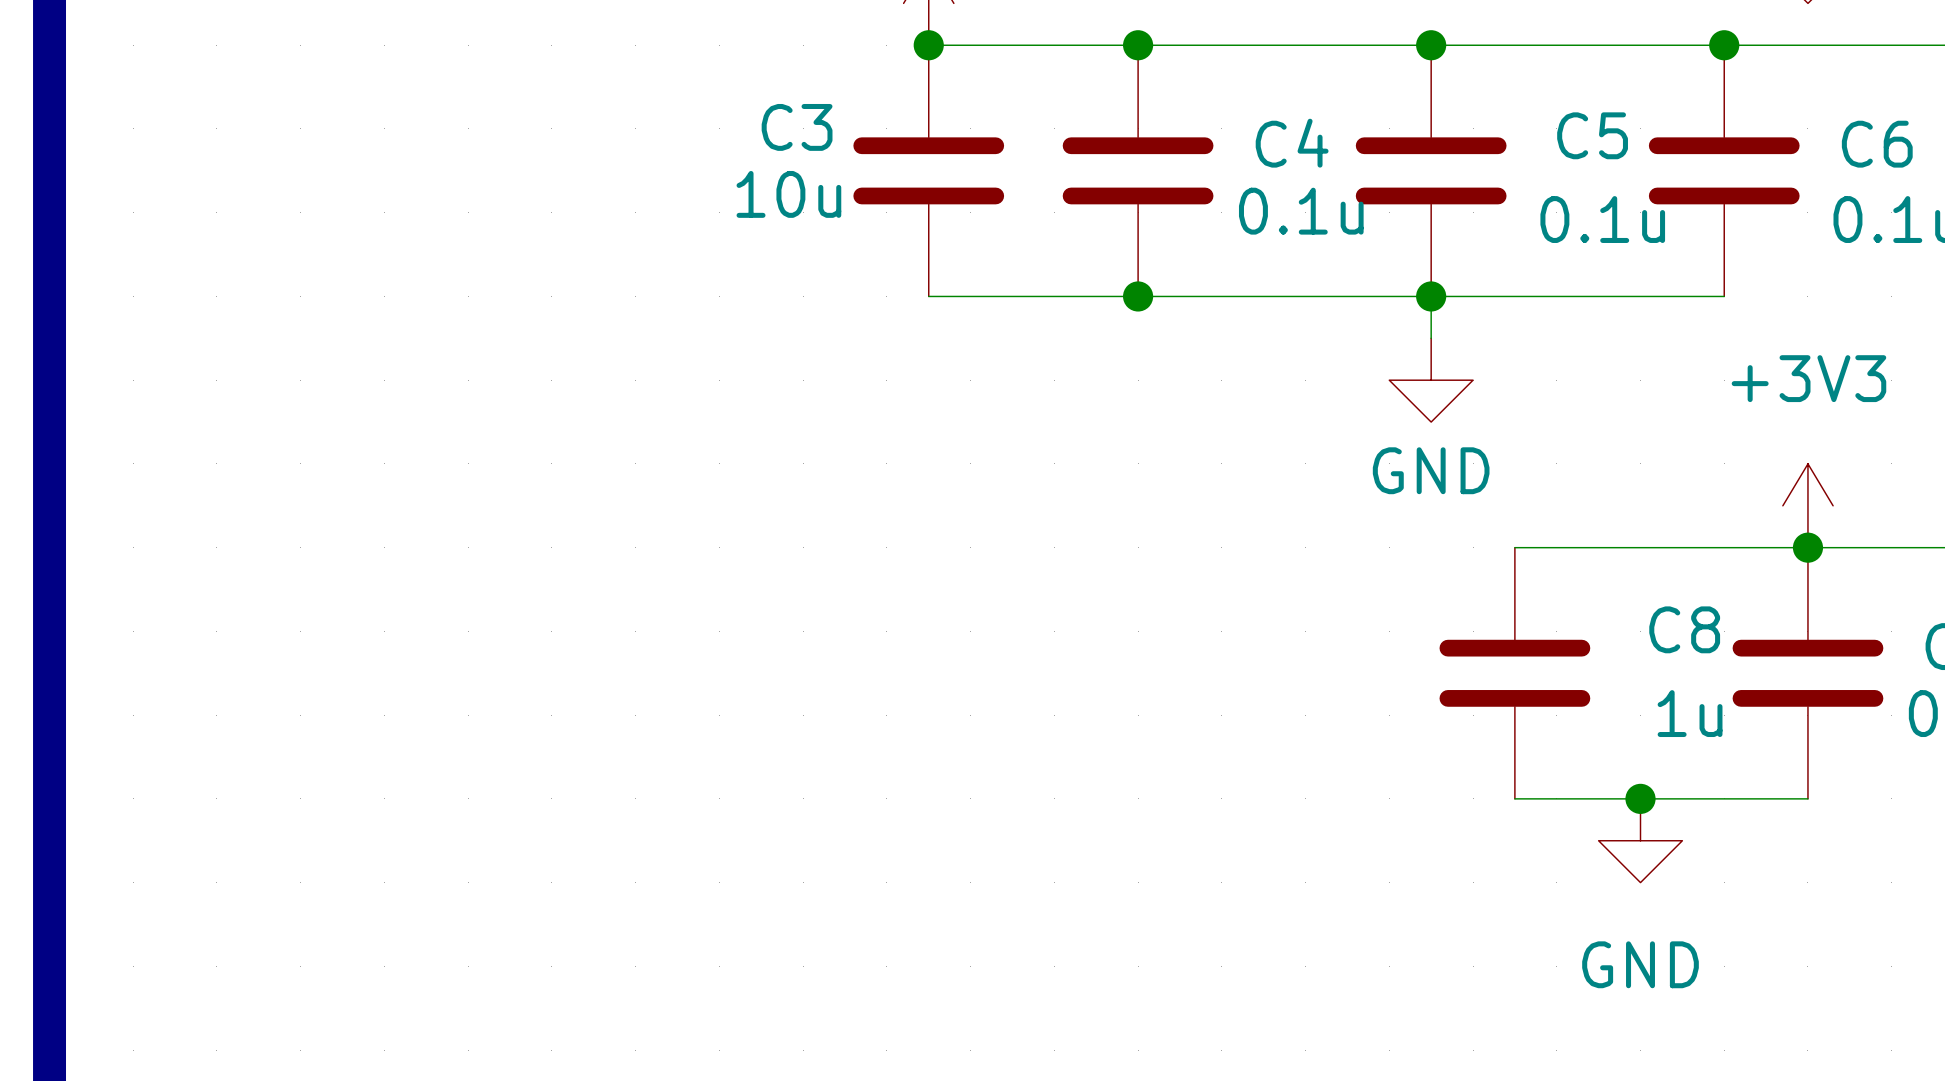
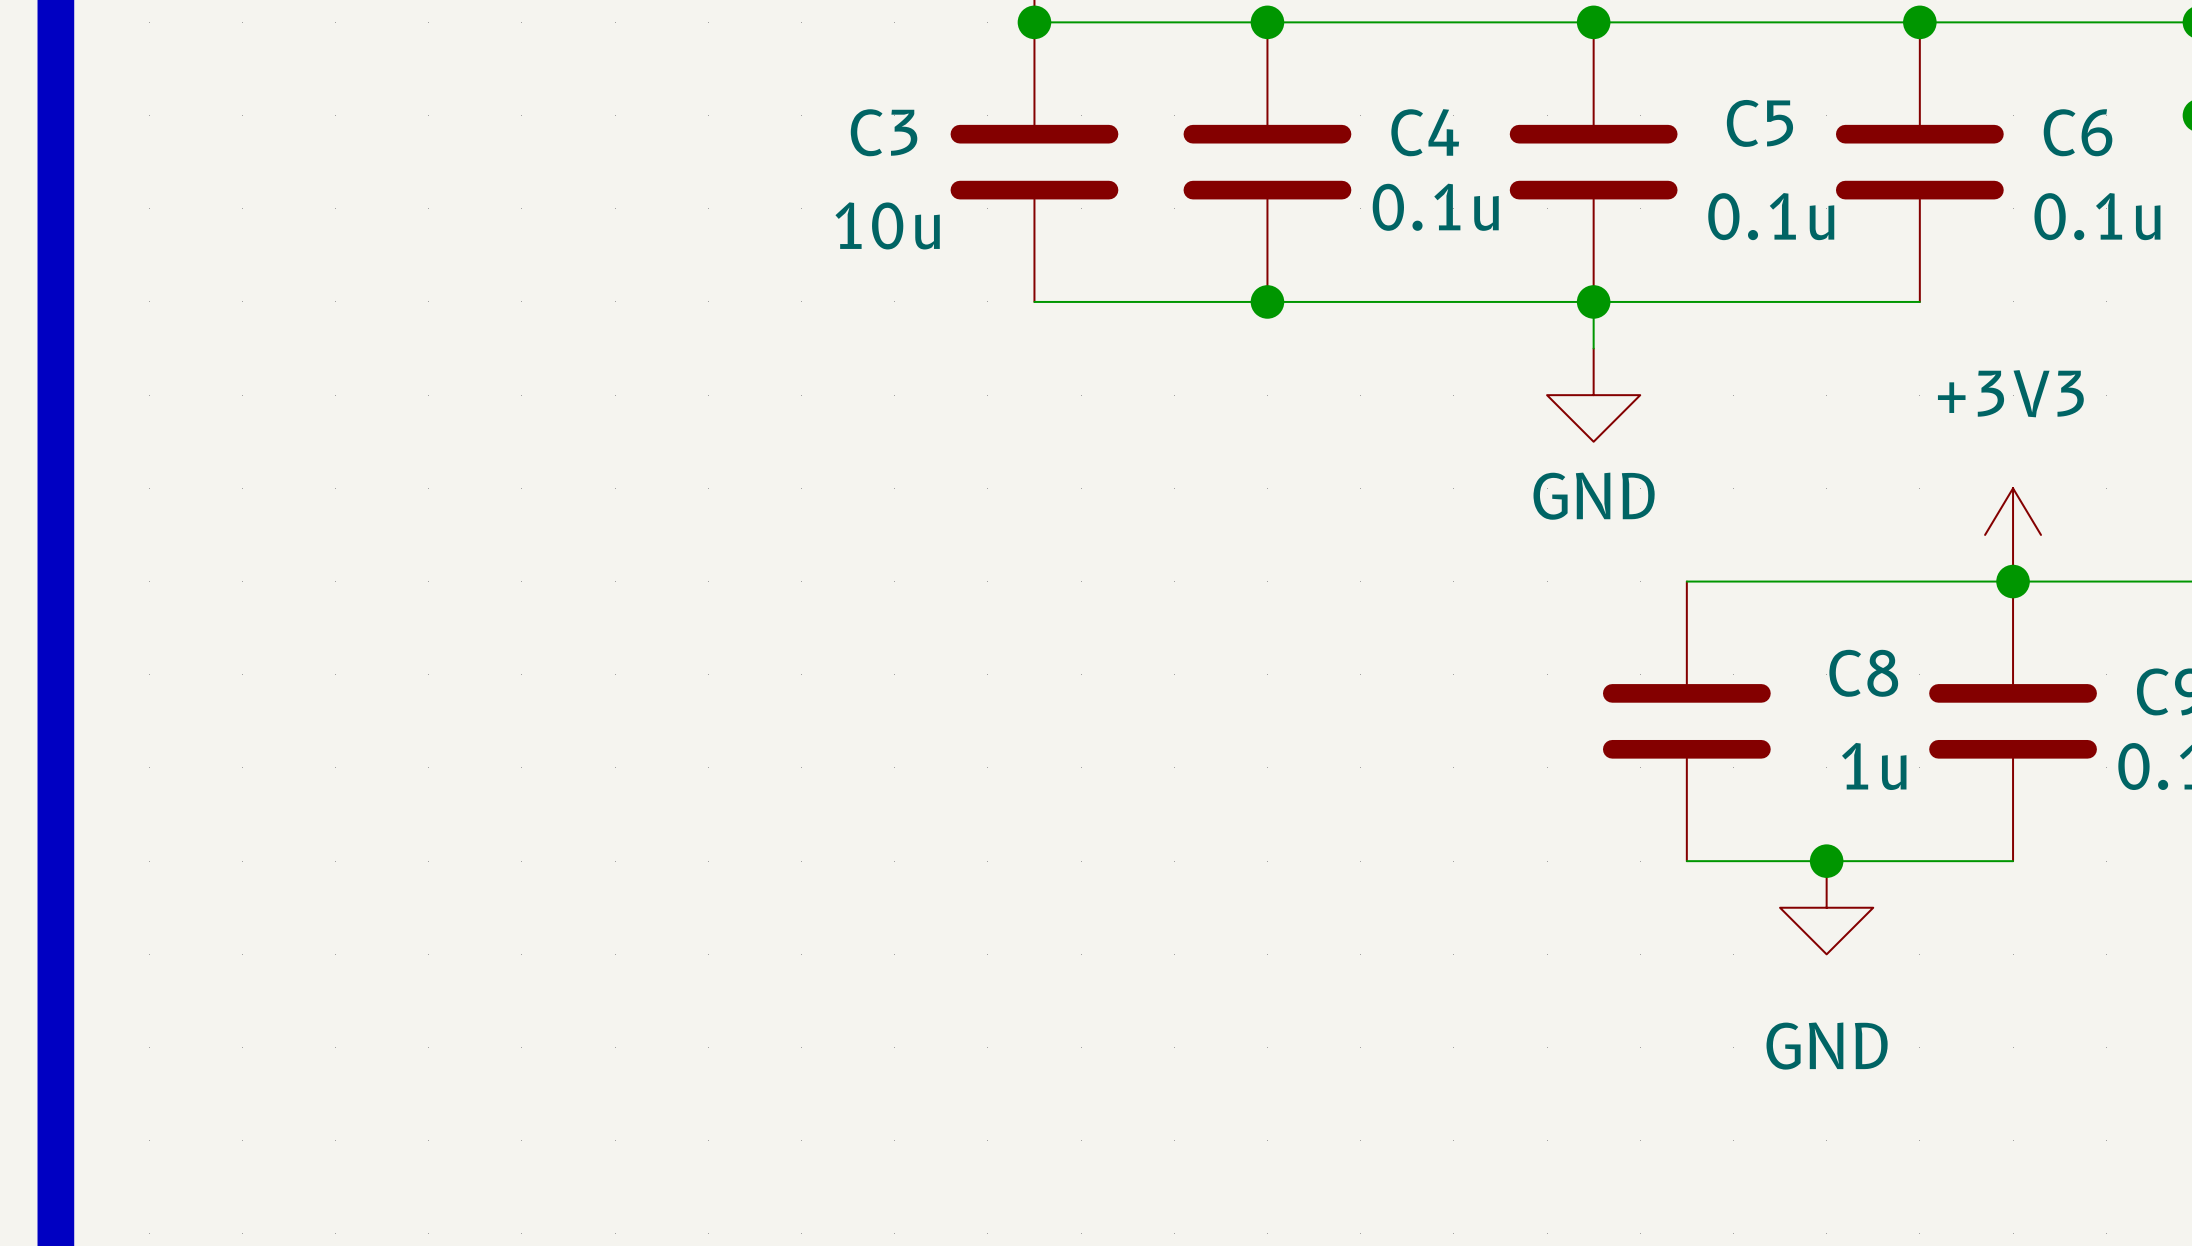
C3 name position: C3 (797, 127) -> C3 (884, 132)
C3 value position: 10u (788, 194) -> 10u (887, 225)

